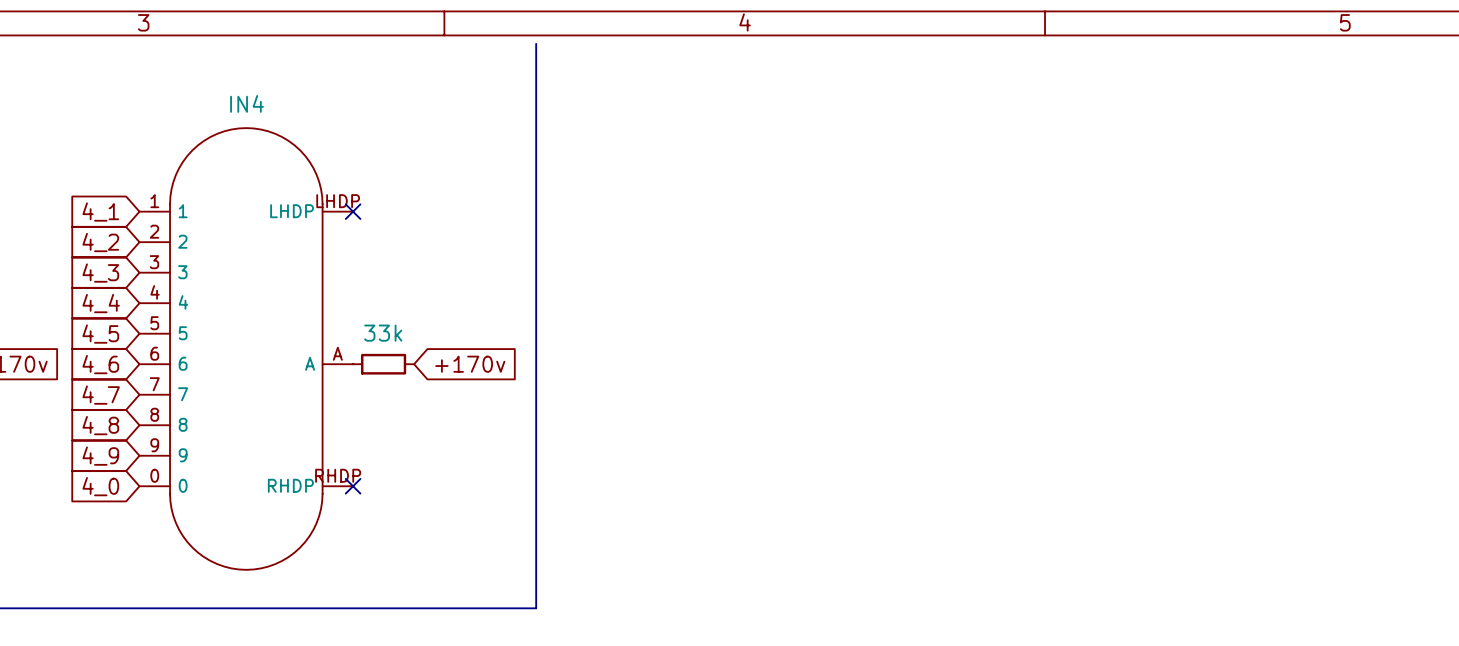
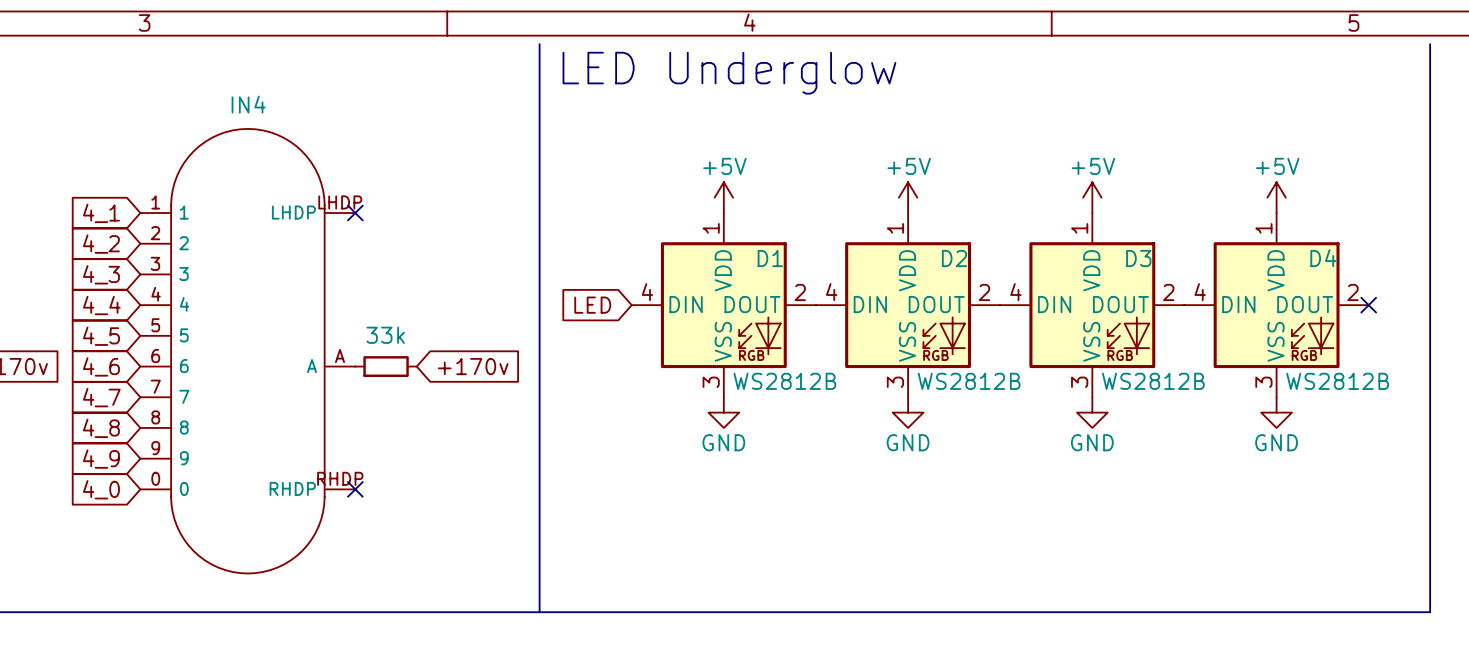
line: none -> (1430, 44) (1430, 612) (539, 612)
text: none -> LED Underglow (729, 73)
power symbol: none -> +5V (723, 197)
power symbol: none -> +5V (908, 197)
power symbol: none -> +5V (1092, 197)
power symbol: none -> +5V (1276, 197)
global label: none -> LED (592, 305)
D1: none -> WS2812B (723, 305)
D2: none -> WS2812B (908, 305)
D3: none -> WS2812B (1092, 305)
D4: none -> WS2812B (1276, 305)
no-connect mark: none -> (1368, 305)
power symbol: none -> GND (723, 412)
power symbol: none -> GND (908, 412)
power symbol: none -> GND (1092, 412)
power symbol: none -> GND (1276, 412)

